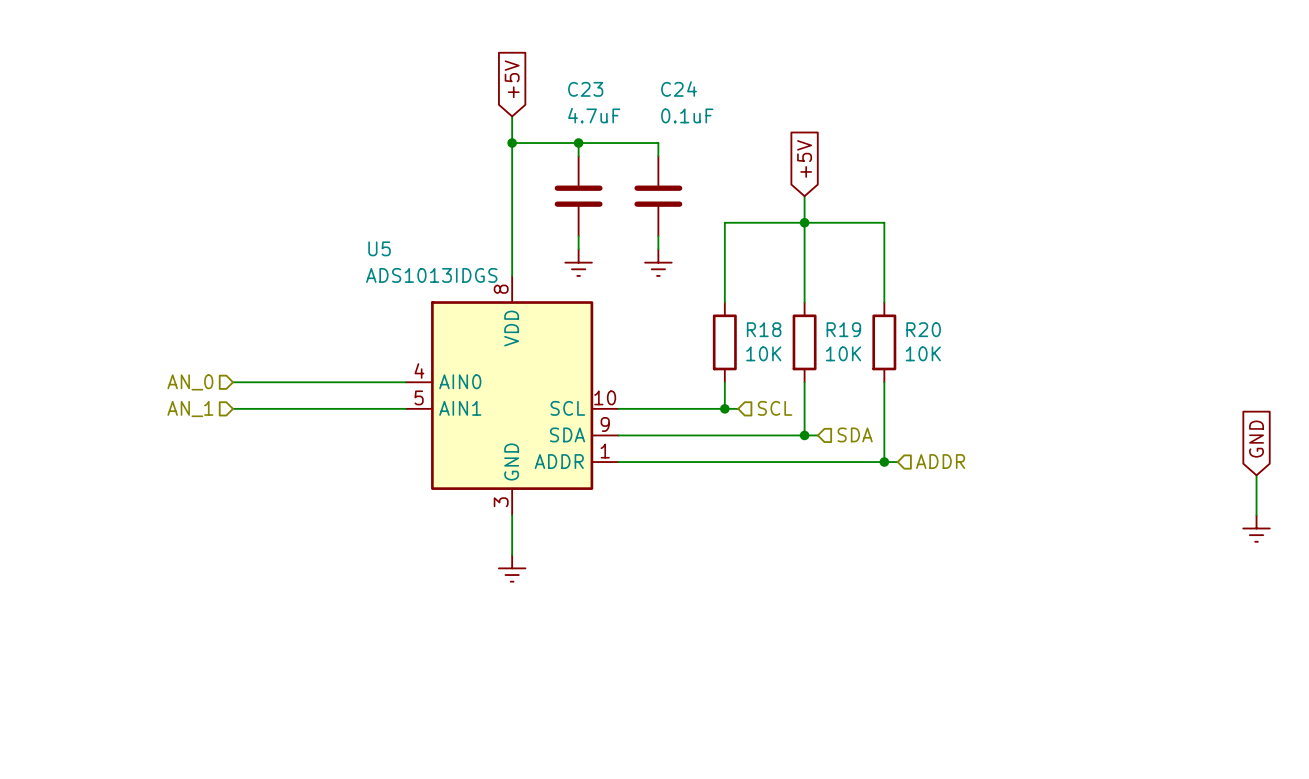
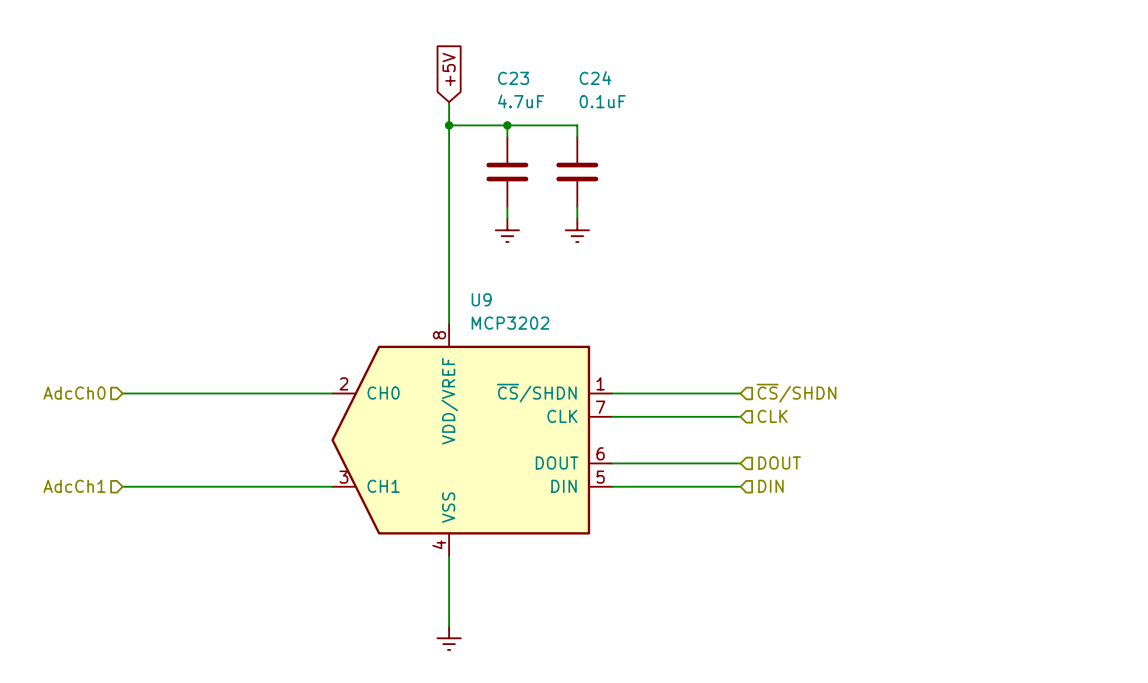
global label: +5V (804, 158) -> none
wire: (804, 196) (804, 302) -> none
junction: (804, 222) -> none
wire: (724, 302) (724, 222) (884, 222) (884, 302) -> none
R18: 10K (724, 342) -> none
R19: 10K (804, 342) -> none
R20: 10K (884, 342) -> none
hierarchical label: AN_0 (190, 382) -> none
wire: (233, 382) (405, 382) -> none
wire: (724, 382) (724, 408) -> none
wire: (804, 382) (804, 435) -> none
wire: (884, 382) (884, 462) -> none
U5: ADS1013IDGS (512, 395) -> none
wire: (233, 408) (405, 408) -> none
wire: (618, 408) (738, 408) -> none
junction: (724, 408) -> none
hierarchical label: SCL (775, 408) -> none
hierarchical label: AN_1 (190, 409) -> none
hierarchical label: SDA (855, 434) -> none
wire: (618, 435) (817, 435) -> none
junction: (804, 435) -> none
global label: GND (1256, 439) -> none
hierarchical label: none -> AdcCh0 (74, 393)
wire: none -> (122, 393) (332, 393)
wire: none -> (612, 393) (740, 393)
hierarchical label: none -> ~{CS}/SHDN (796, 393)
hierarchical label: ADDR (940, 461) -> none
wire: (618, 462) (897, 462) -> none
junction: (884, 462) -> none
hierarchical label: none -> CLK (772, 416)
wire: none -> (612, 416) (740, 416)
wire: (1256, 475) (1256, 515) -> none
U9: none -> MCP3202 (471, 440)
wire: none -> (612, 463) (740, 463)
hierarchical label: none -> DOUT (779, 463)
power symbol: (1256, 528) -> none
hierarchical label: none -> AdcCh1 (74, 486)
hierarchical label: none -> DIN (770, 486)
wire: none -> (122, 486) (332, 486)
wire: none -> (612, 486) (740, 486)
power symbol position: (512, 568) -> (449, 638)
wire: none -> (449, 556) (449, 626)

